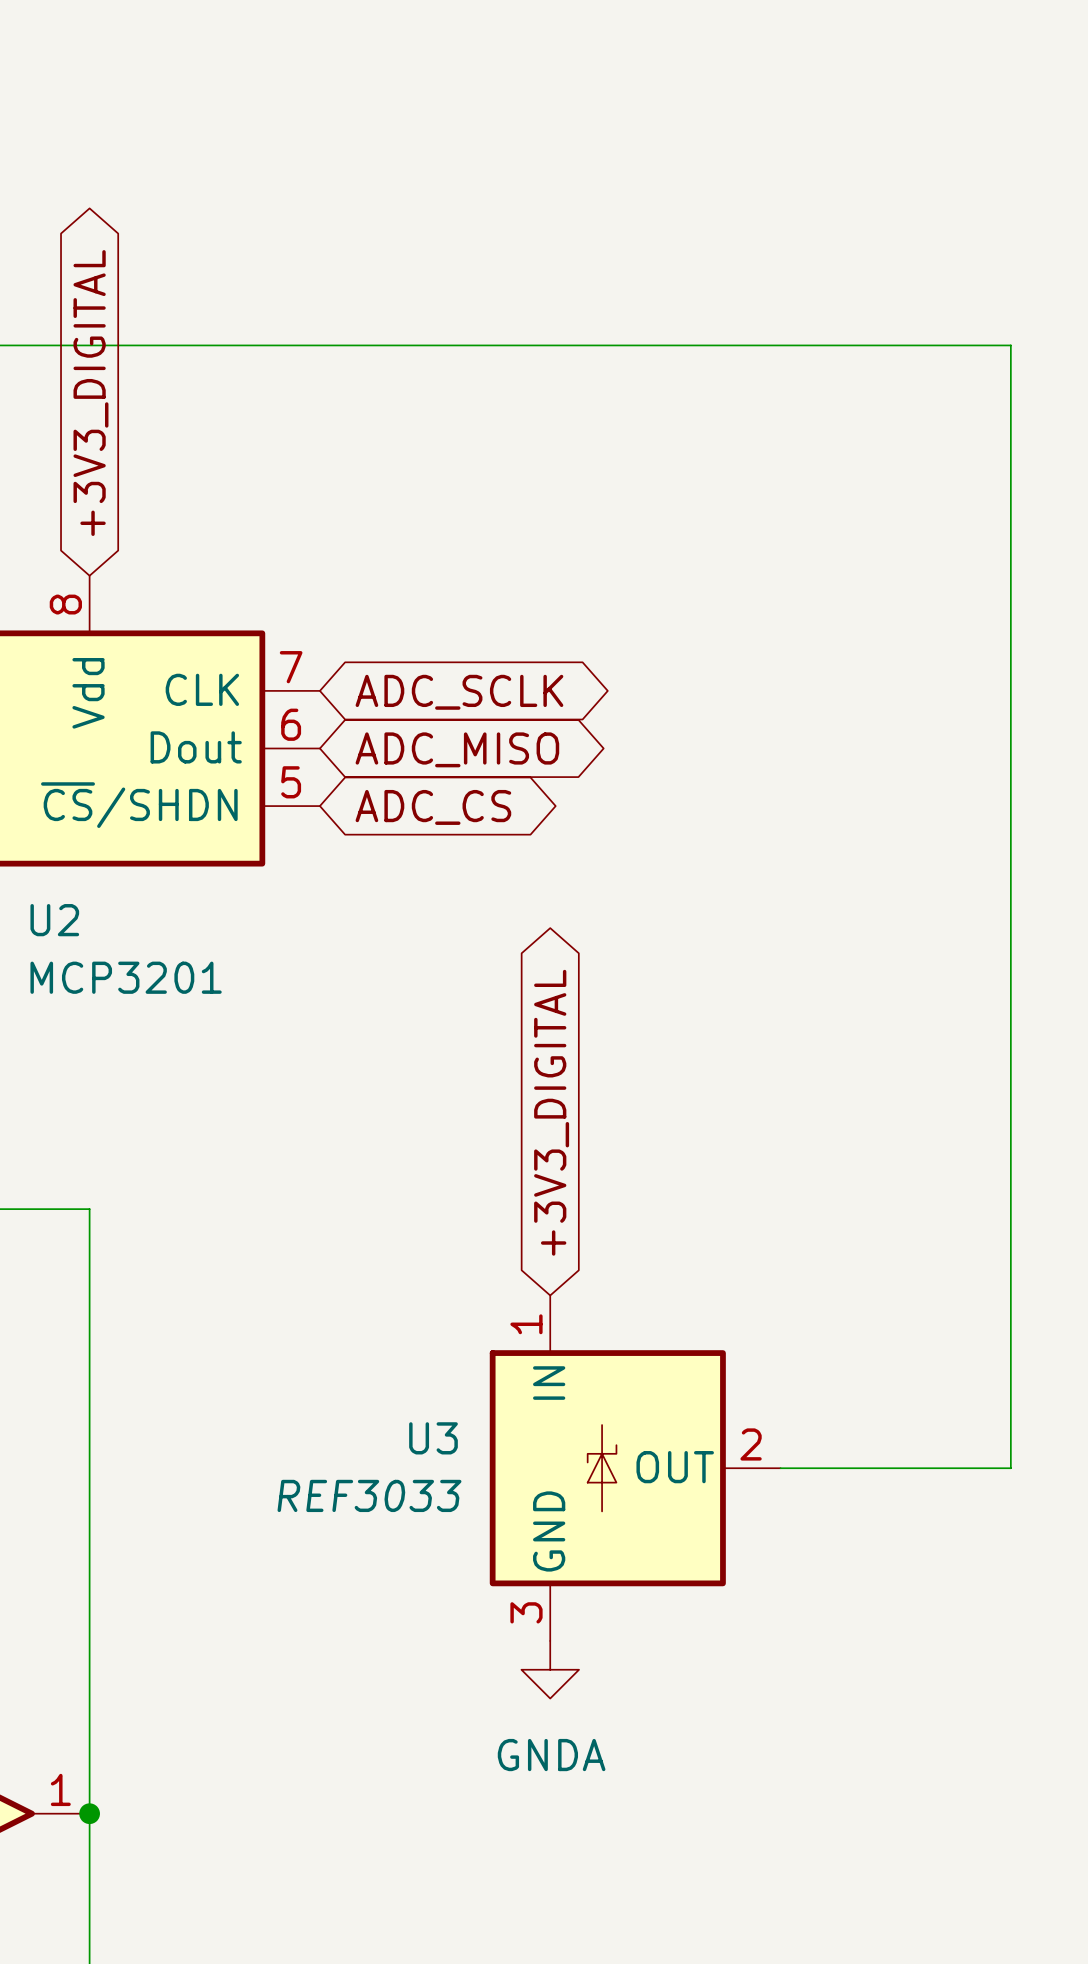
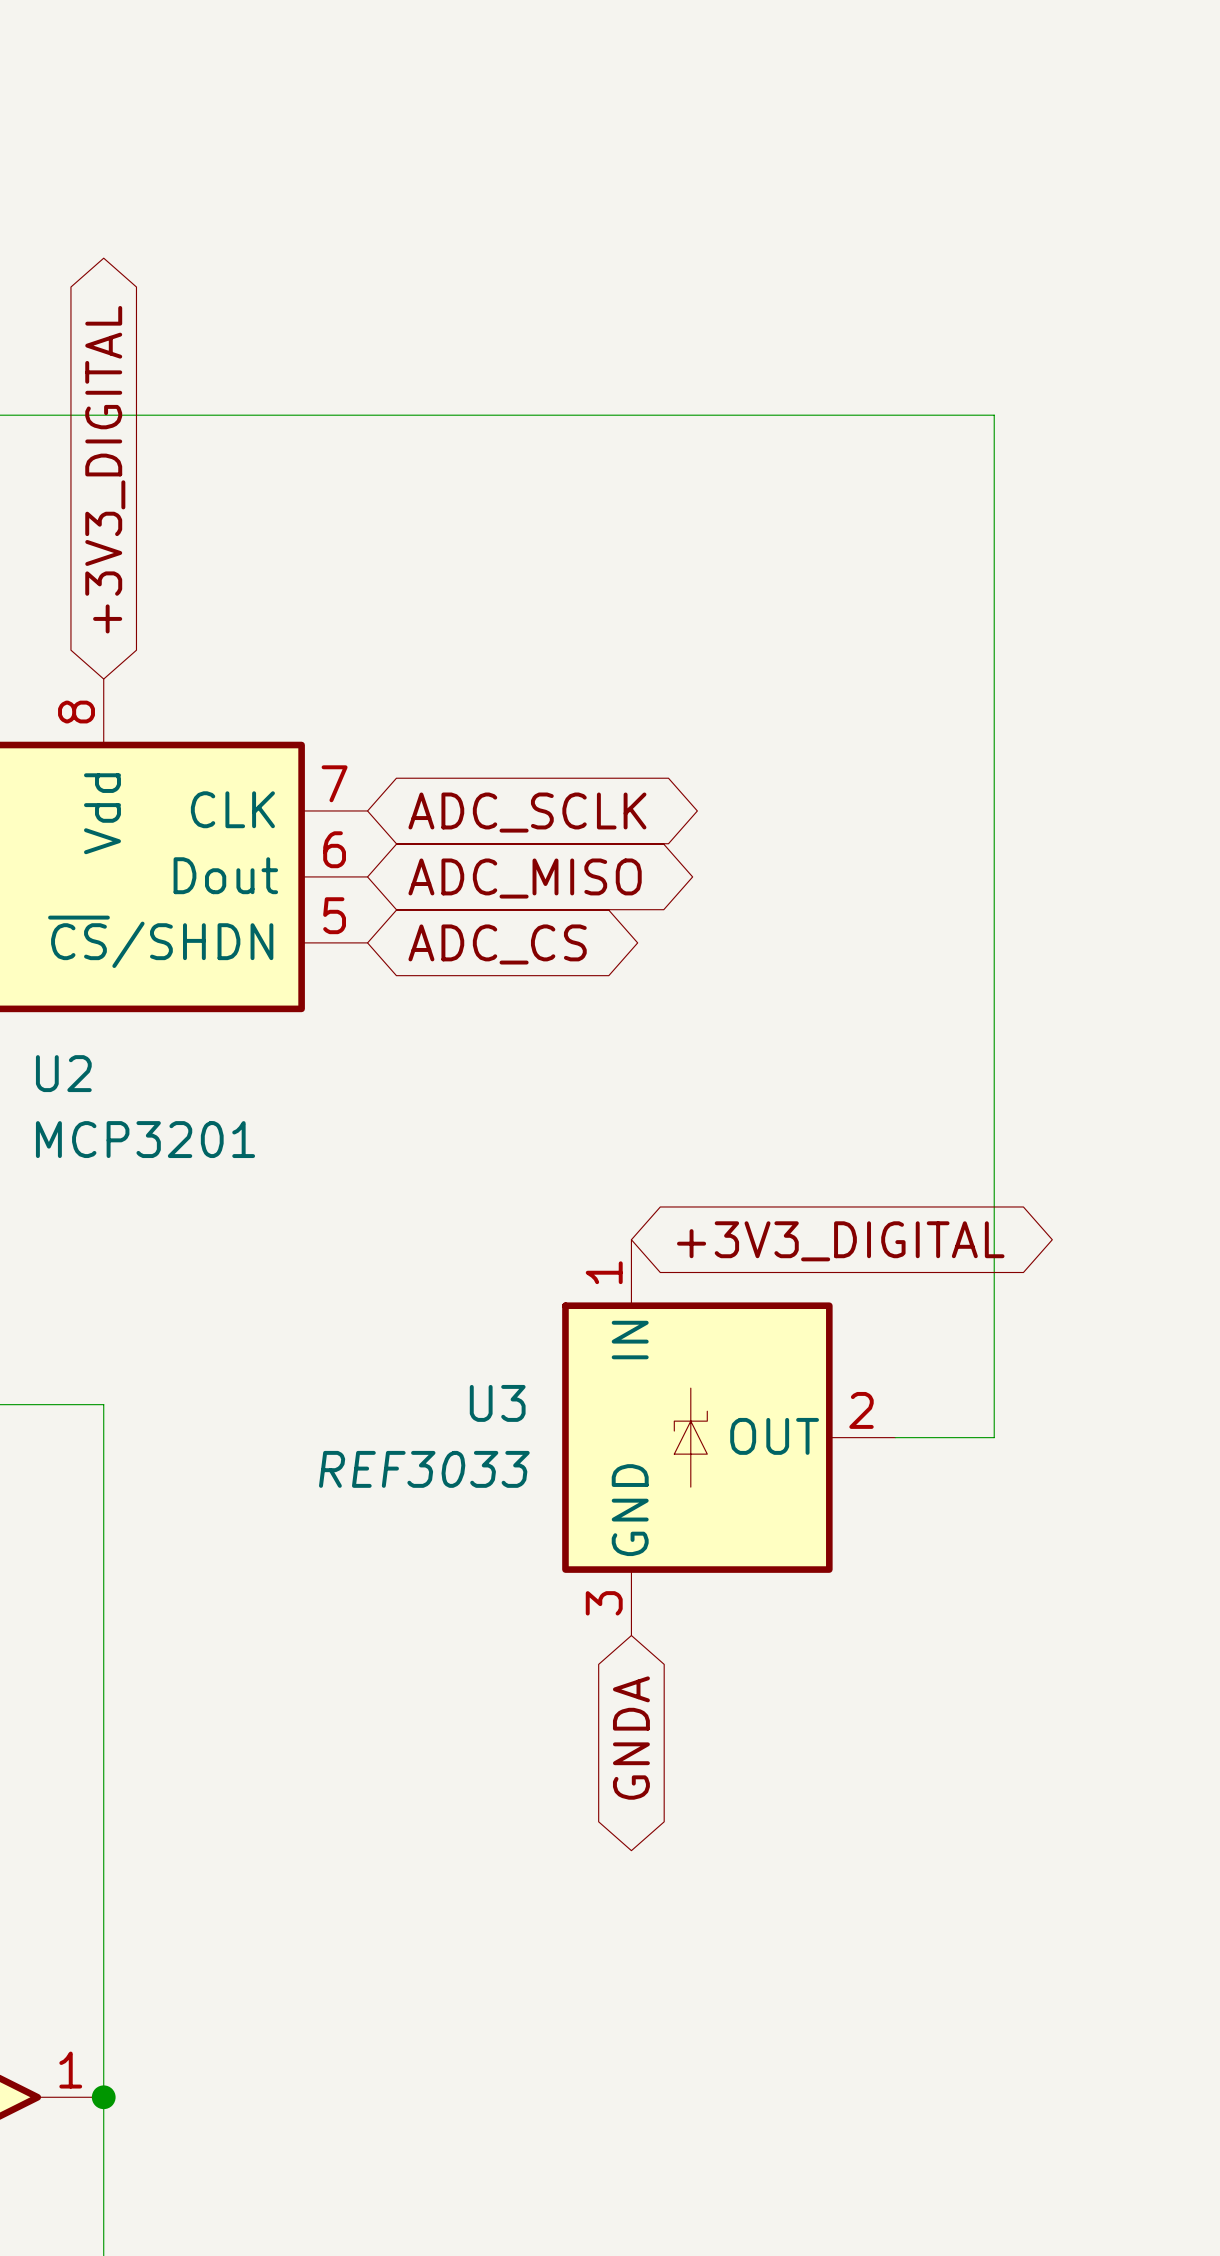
wire: (866, 345) (1010, 345) (1010, 1468) (780, 1468) -> (994, 415) (994, 1437) (895, 1437)
global label rotation: 0° (551, 1112) -> 90° clockwise (840, 1241)
U3 position: (635, 1468) -> (728, 1437)
global label: none -> GNDA (631, 1738)
power symbol: GNDA (550, 1669) -> none

